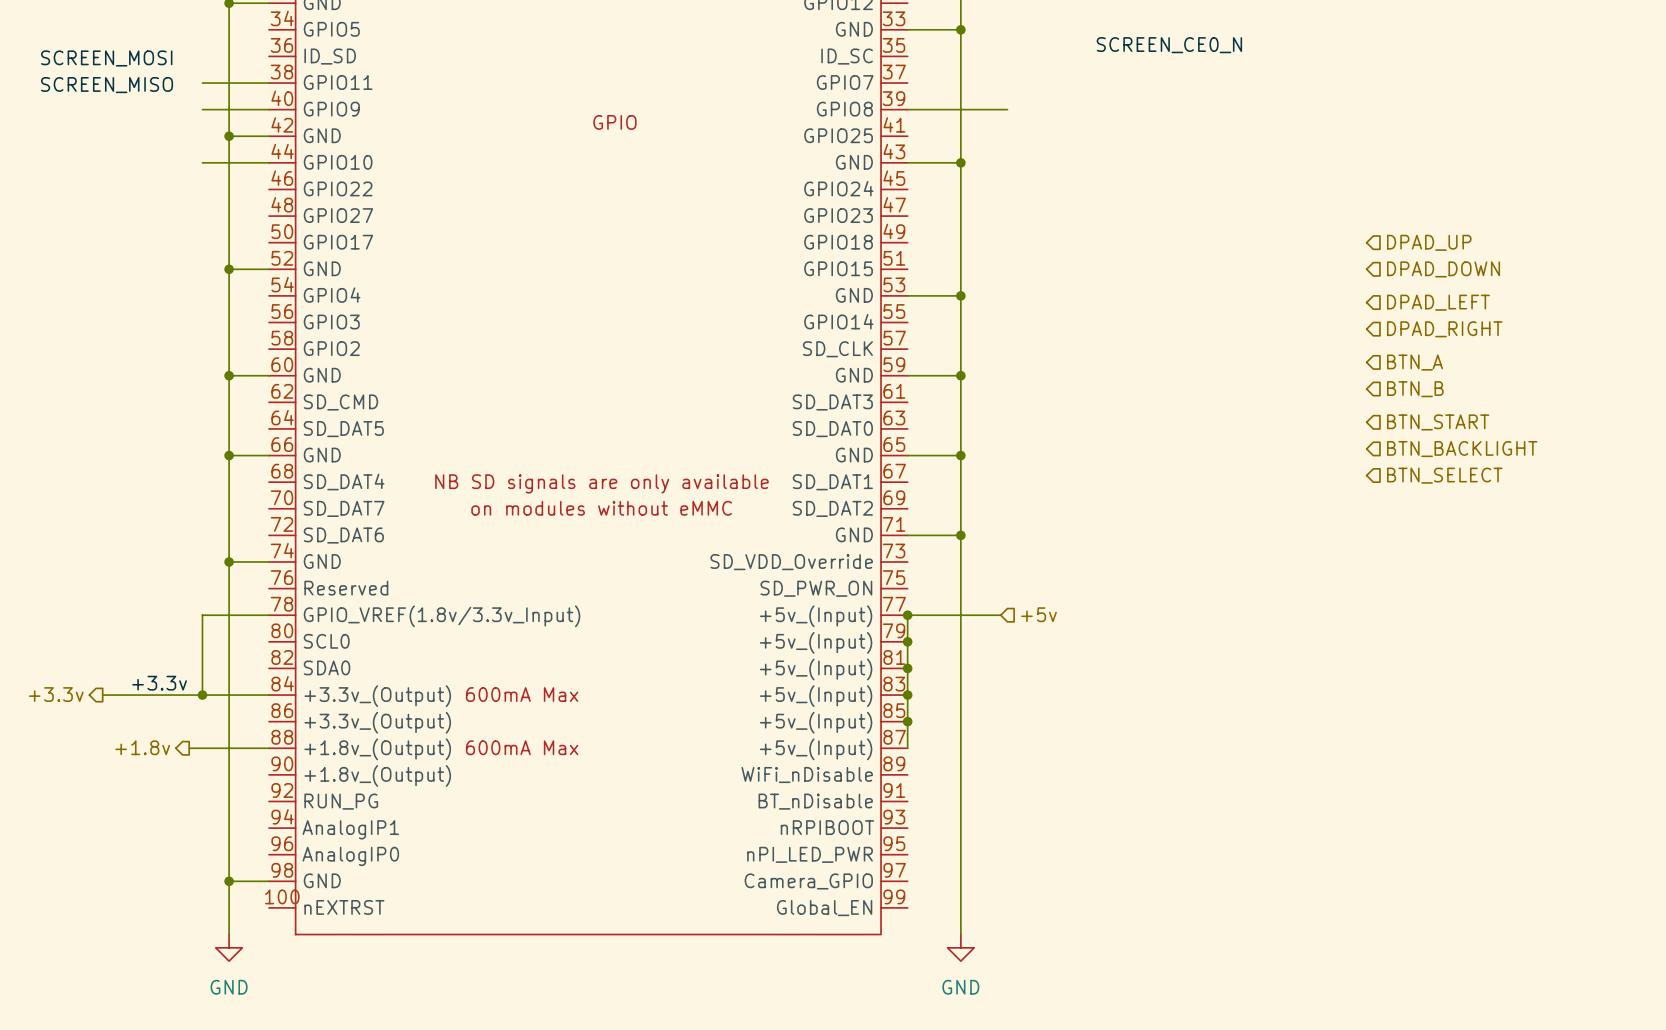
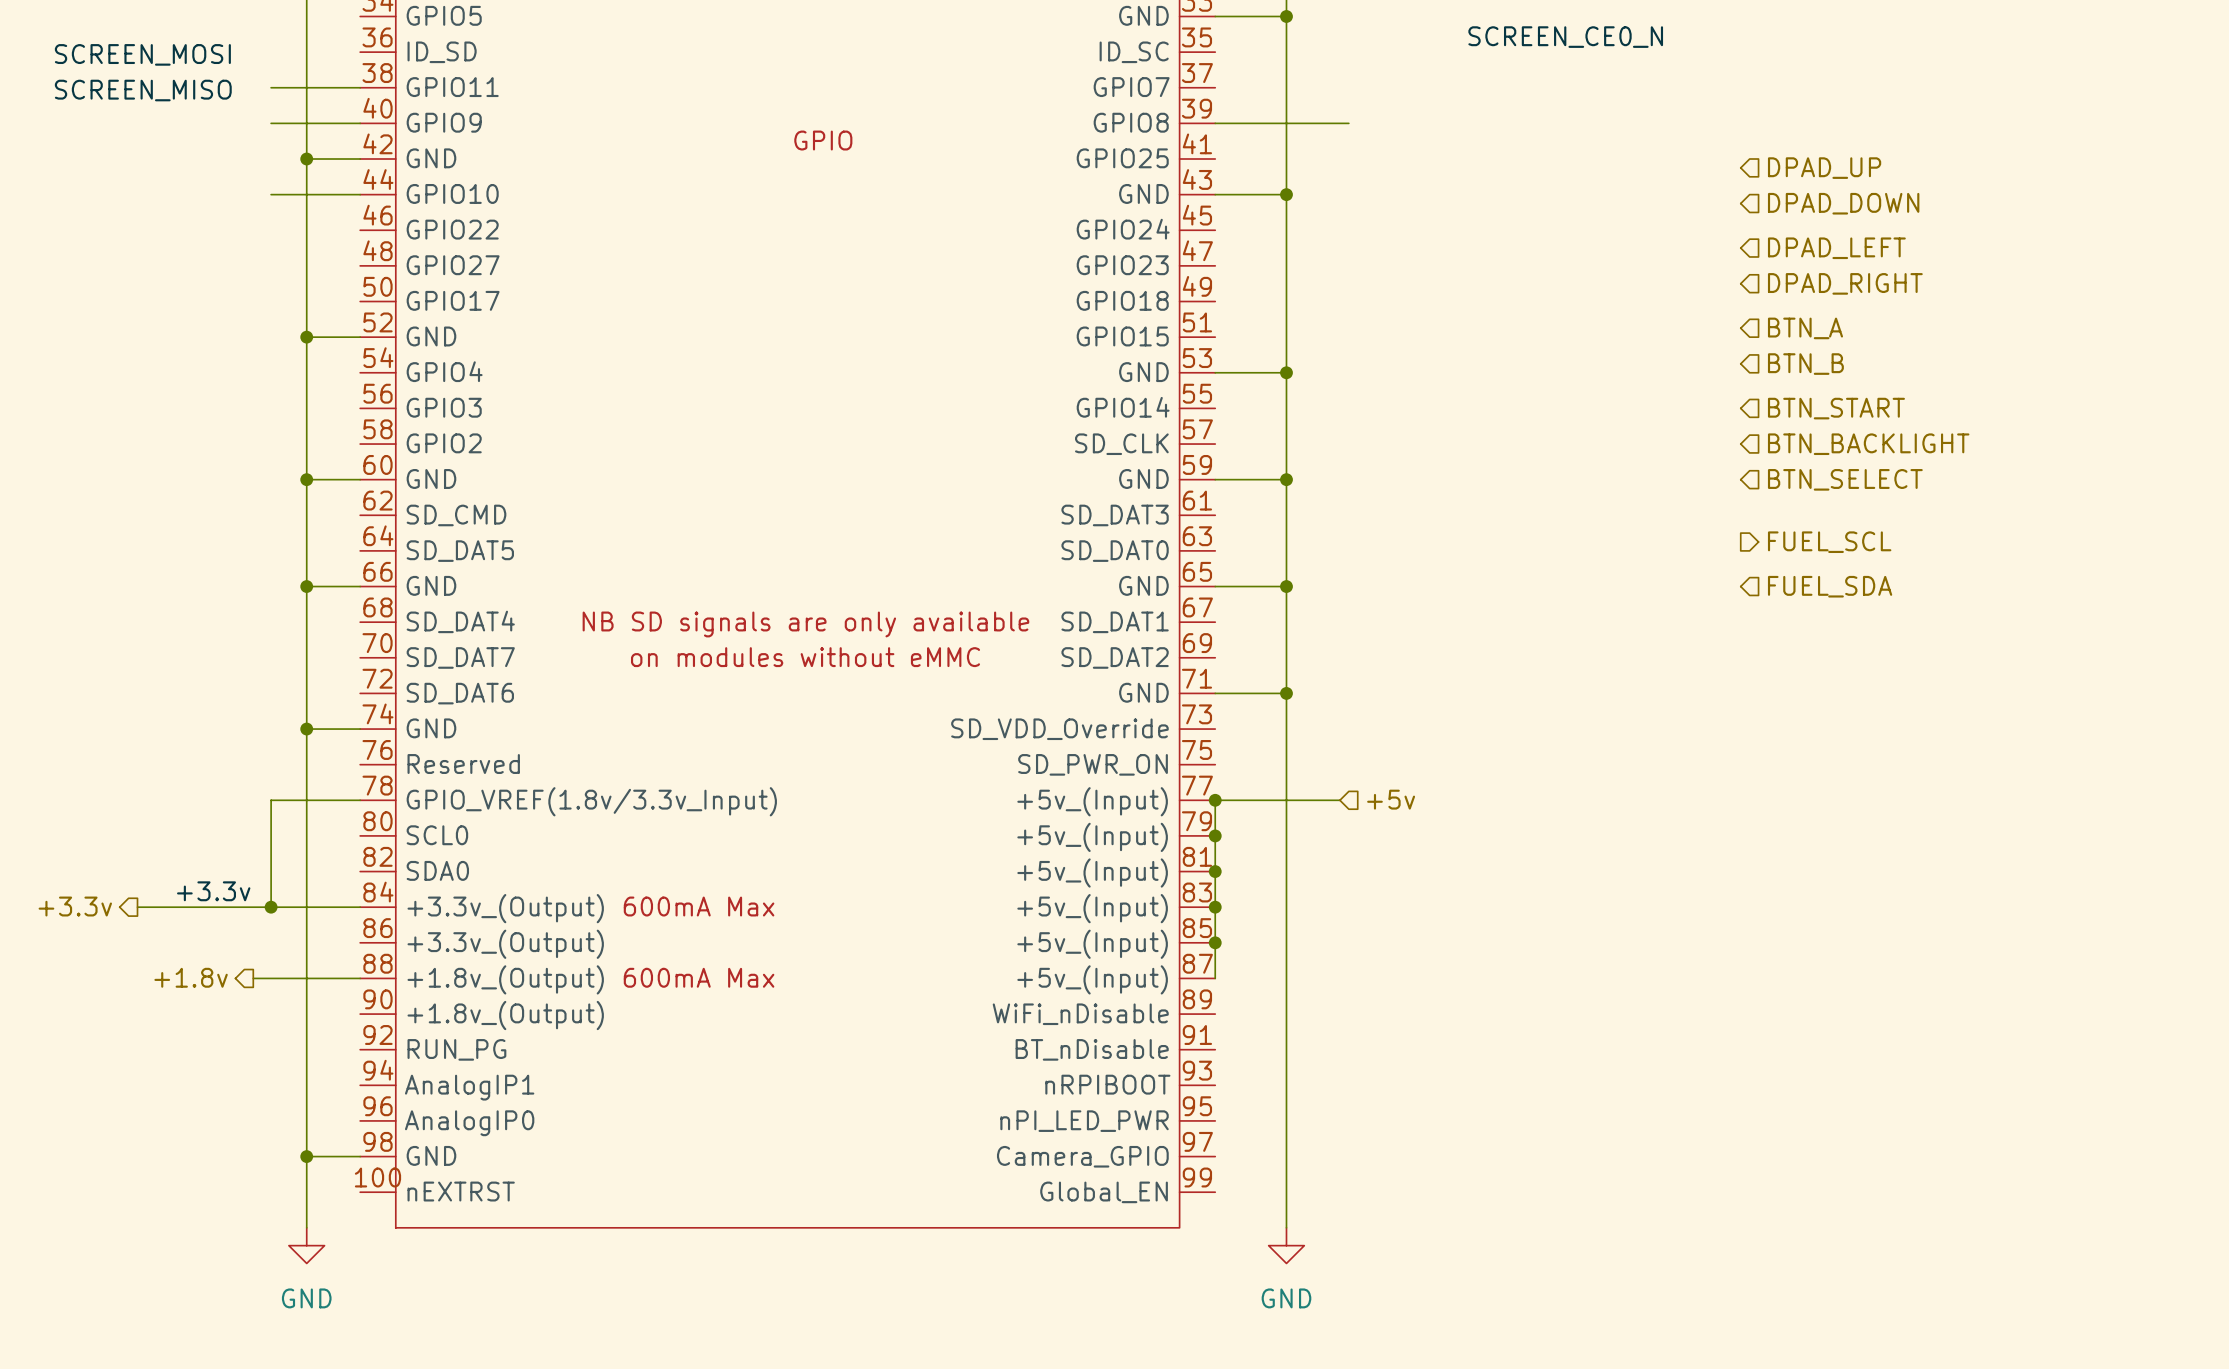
hierarchical label position: DPAD_UP (1429, 242) -> DPAD_UP (1824, 168)
hierarchical label position: DPAD_DOWN (1443, 269) -> DPAD_DOWN (1843, 203)
hierarchical label position: DPAD_LEFT (1438, 302) -> DPAD_LEFT (1836, 248)
hierarchical label position: DPAD_RIGHT (1444, 329) -> DPAD_RIGHT (1845, 283)
hierarchical label position: BTN_A (1415, 362) -> BTN_A (1805, 328)
hierarchical label position: BTN_B (1415, 389) -> BTN_B (1805, 364)
hierarchical label: none -> FUEL_SCL (1829, 542)
hierarchical label position: BTN_START (1438, 422) -> BTN_START (1836, 408)
hierarchical label position: BTN_BACKLIGHT (1462, 449) -> BTN_BACKLIGHT (1868, 444)
hierarchical label: none -> FUEL_SDA (1830, 586)
hierarchical label position: BTN_SELECT (1444, 475) -> BTN_SELECT (1845, 479)

